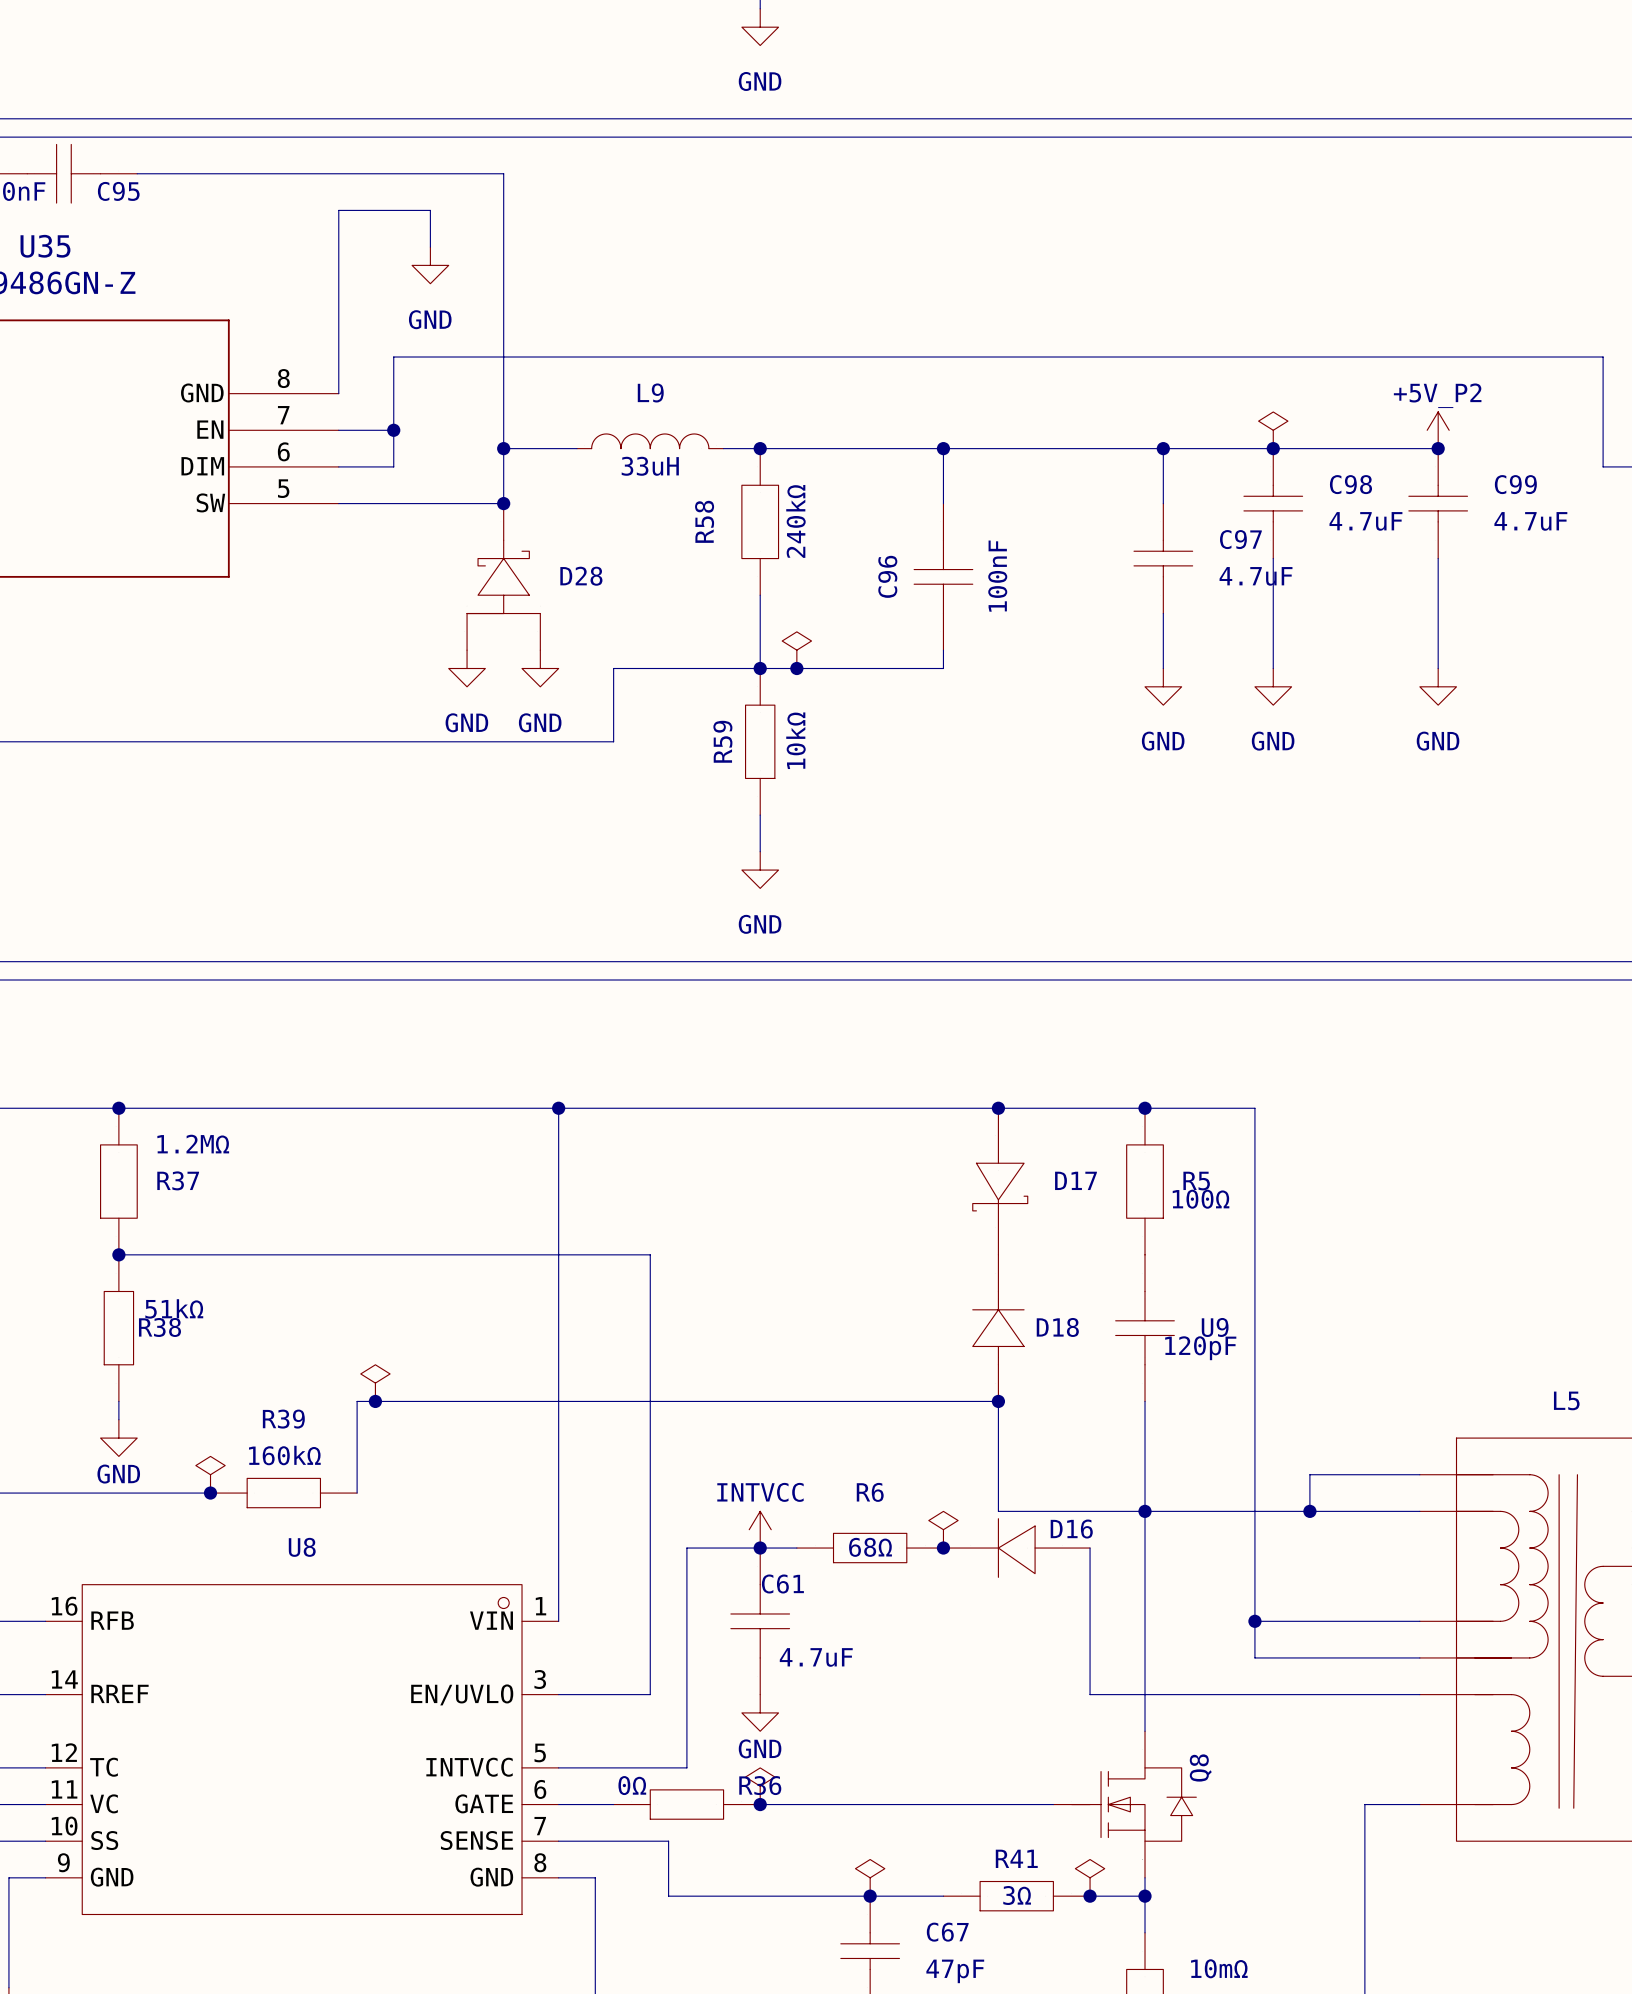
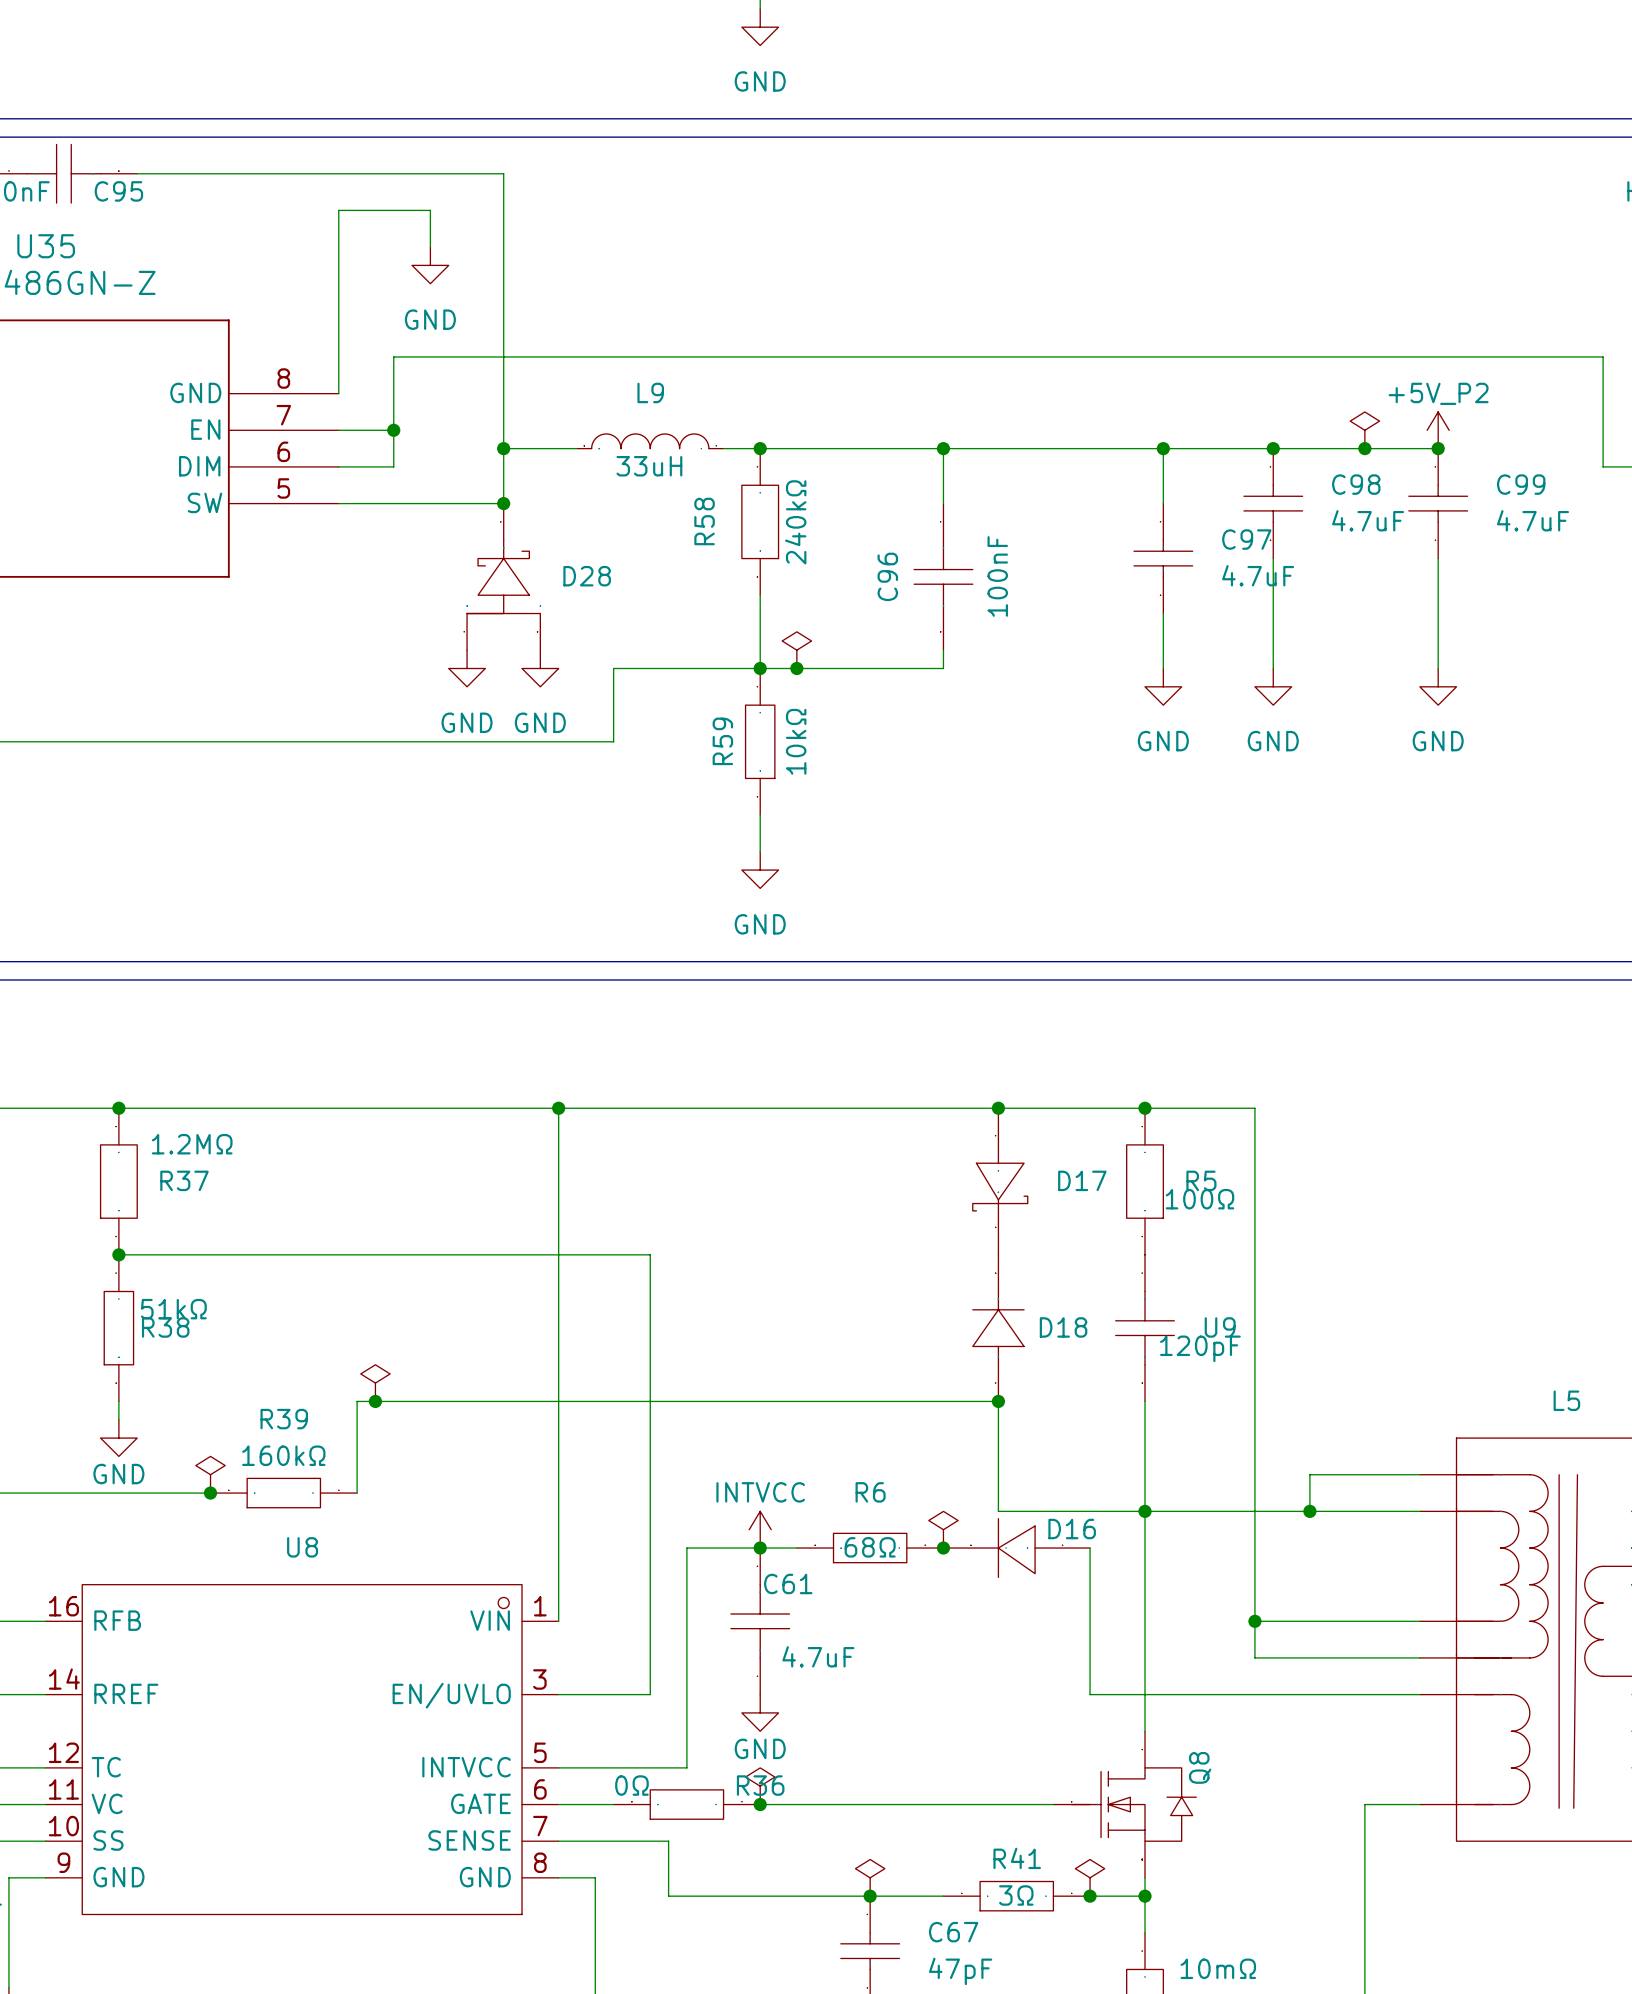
power symbol position: (1273, 430) -> (1364, 430)
junction: none -> (1364, 448)

